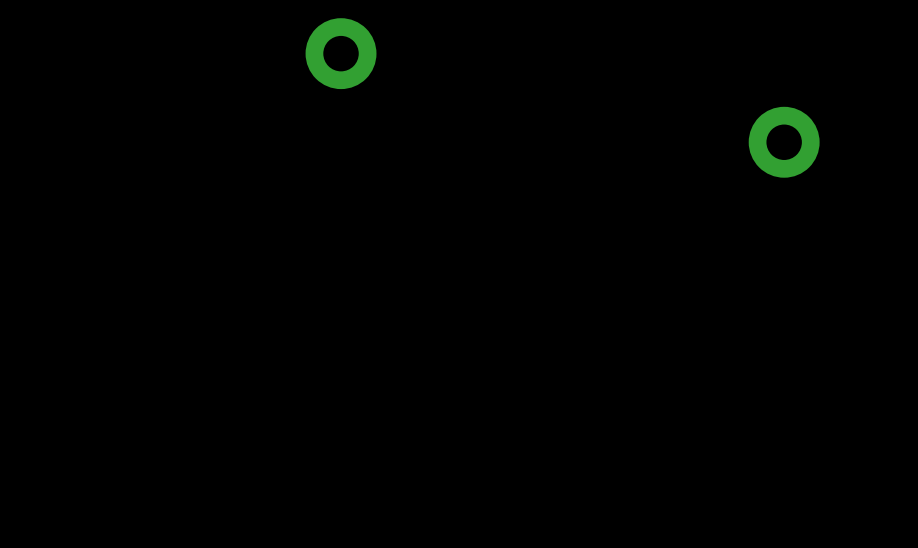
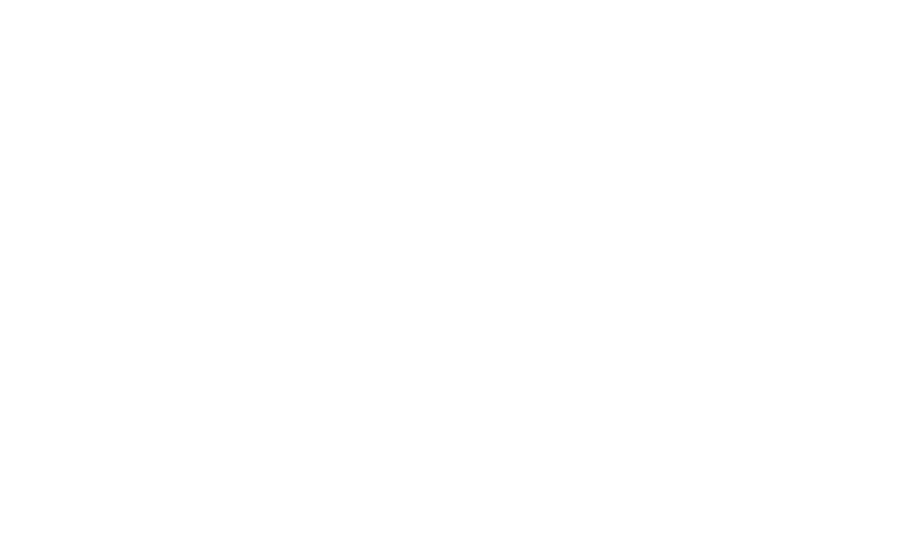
via: (341, 53) -> none
via: (784, 142) -> none

